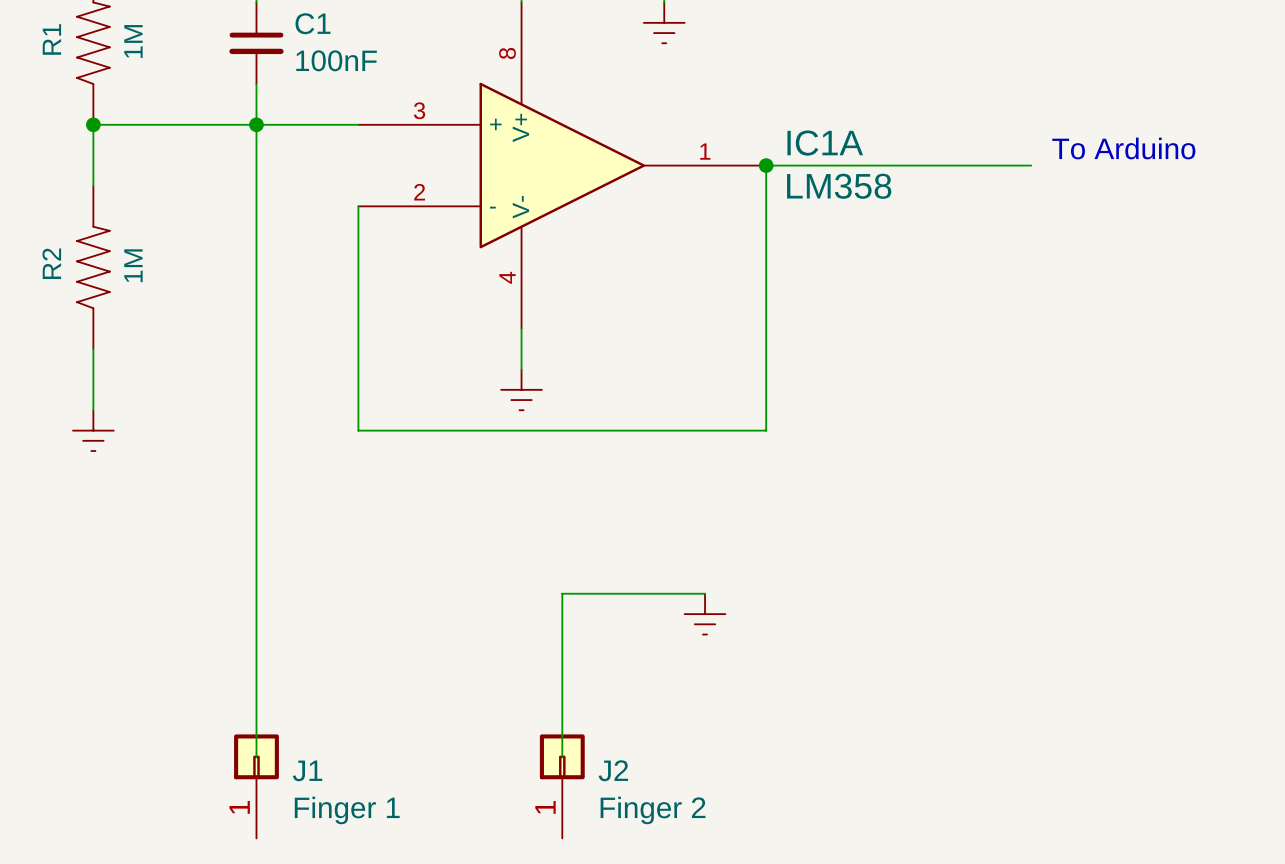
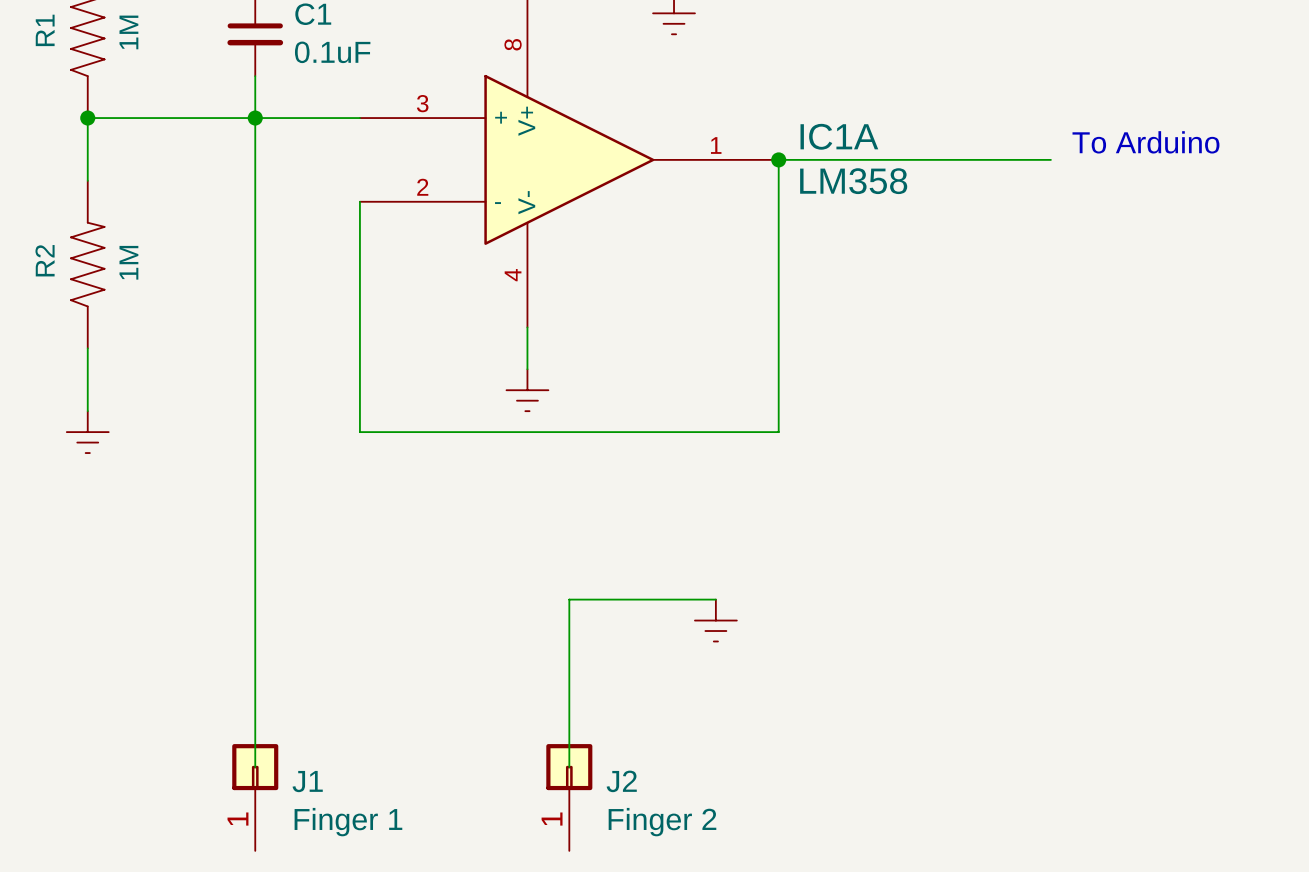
C1 value: 100nF (336, 60) -> 0.1uF (332, 52)

